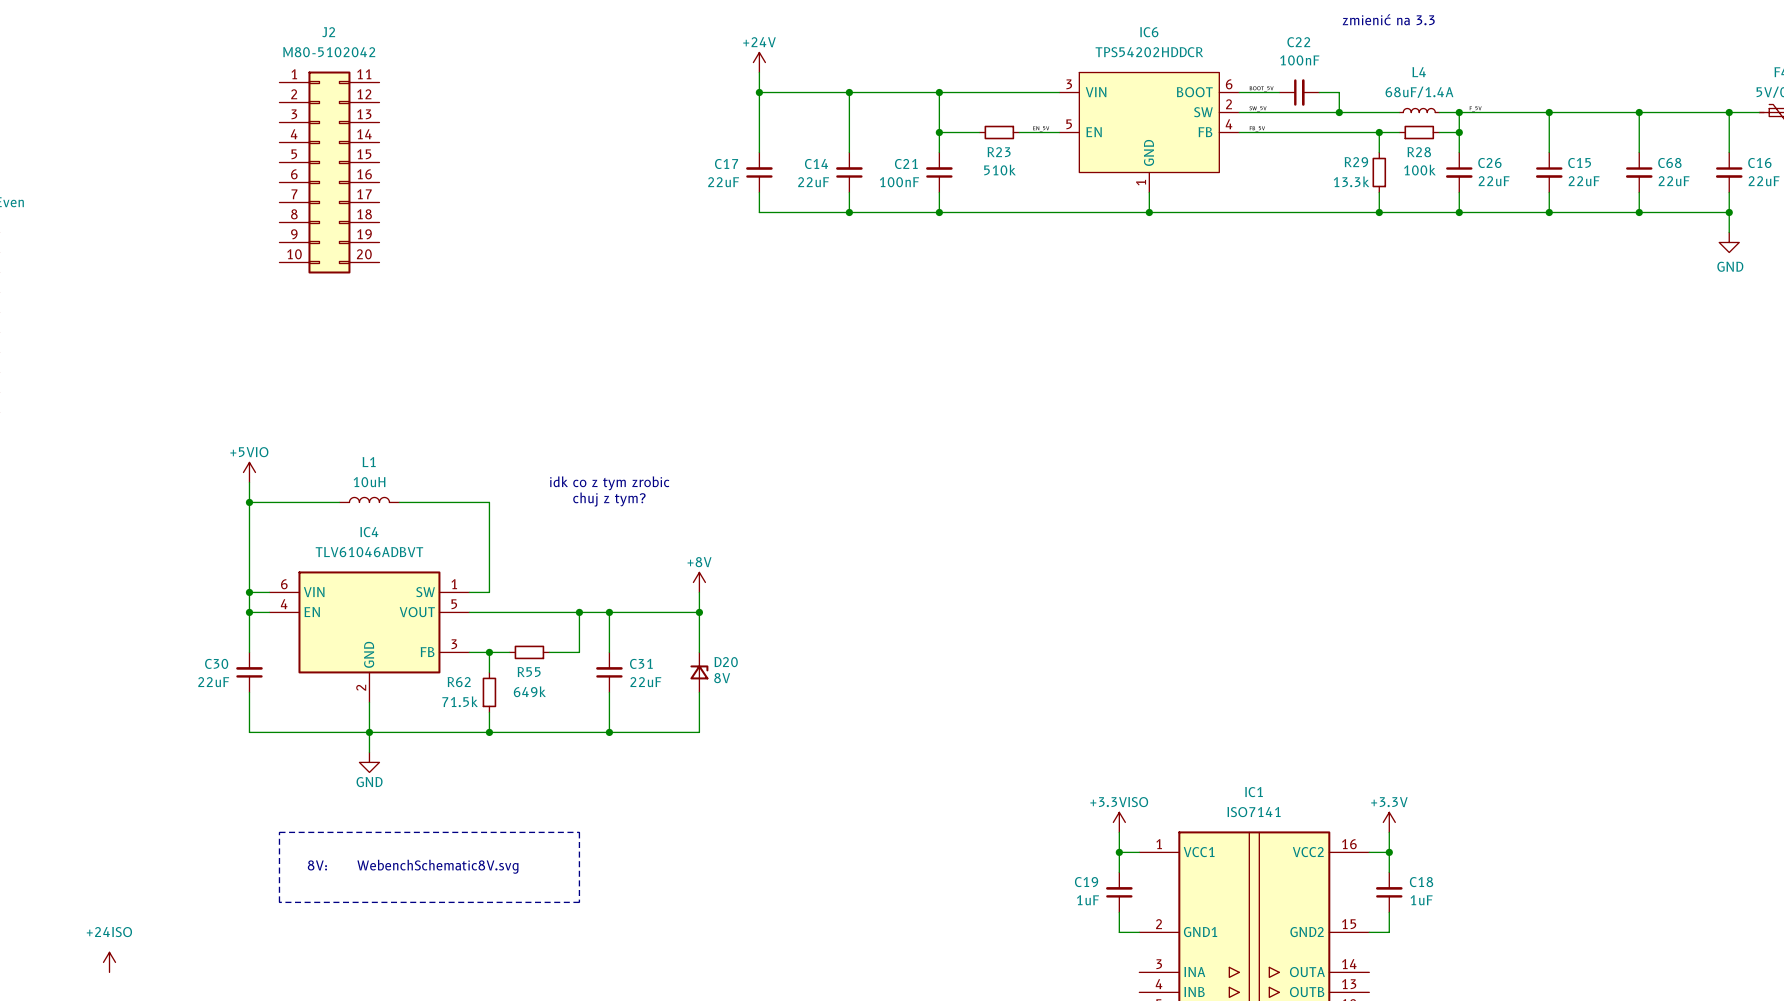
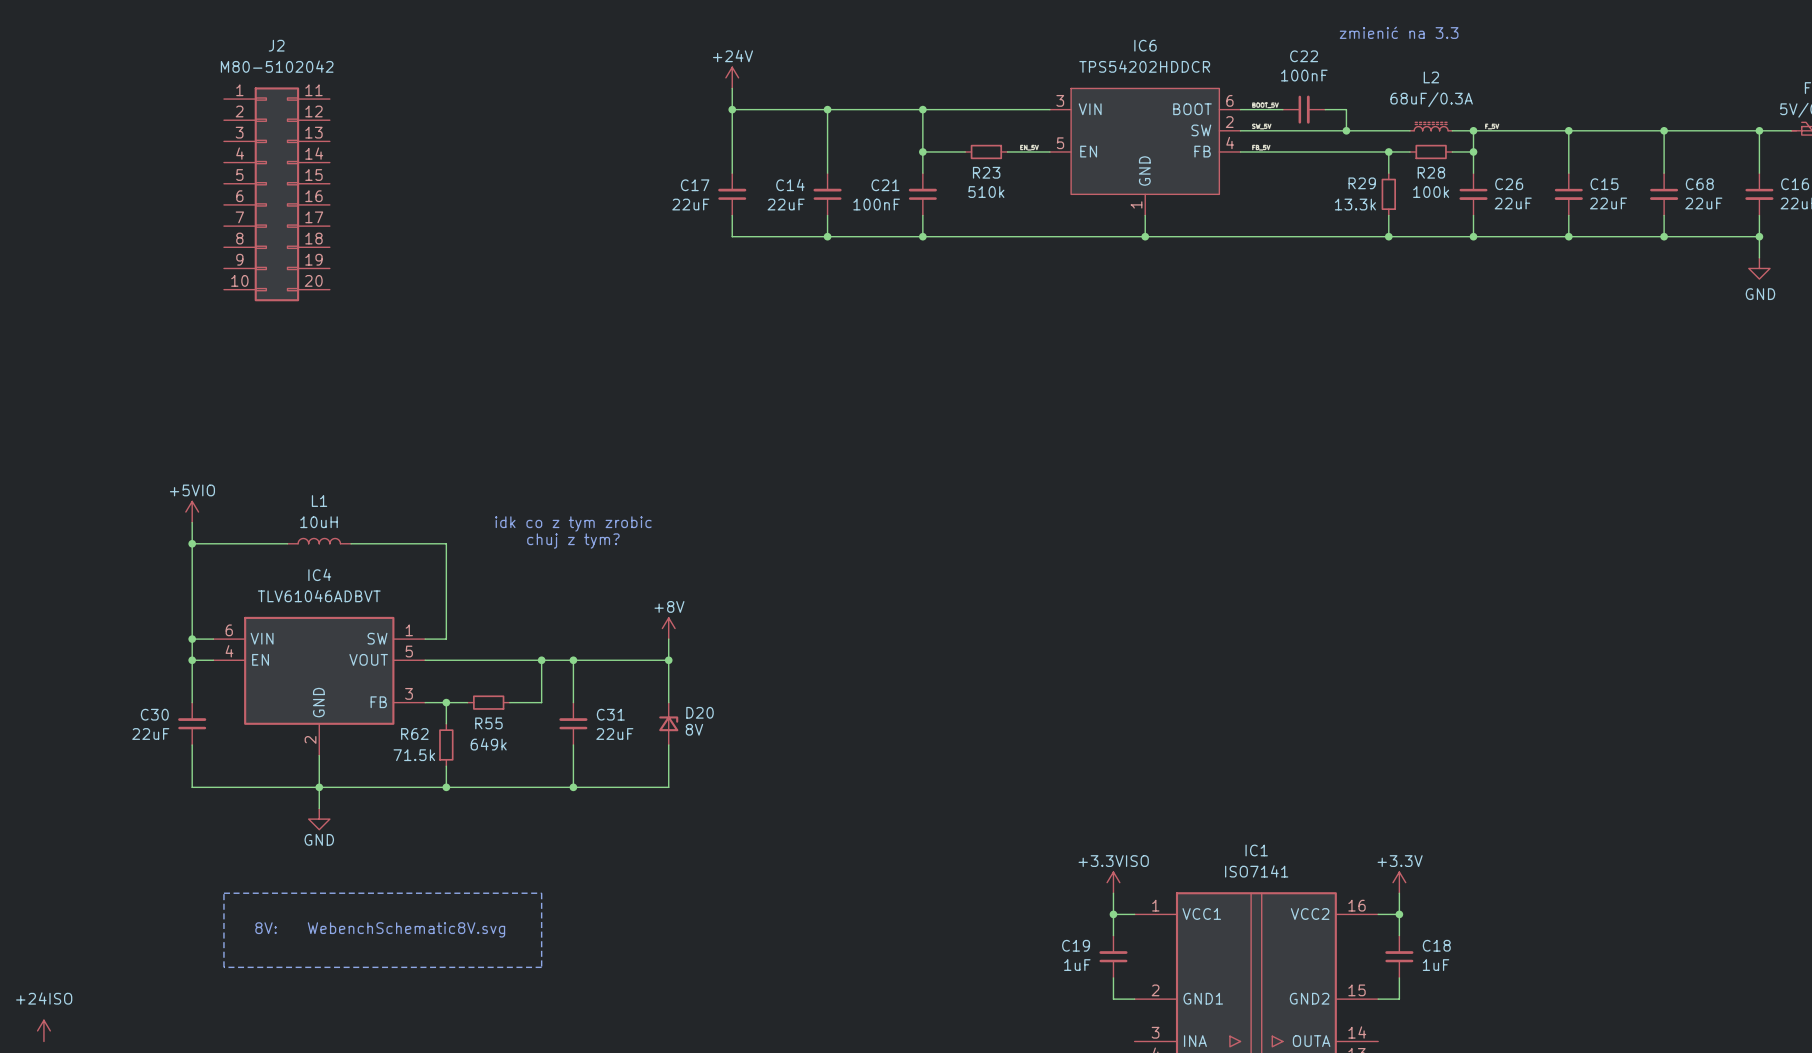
L2: none -> 68uF/0.3A (1431, 126)
L4: 68uF/1.4A (1419, 110) -> none

